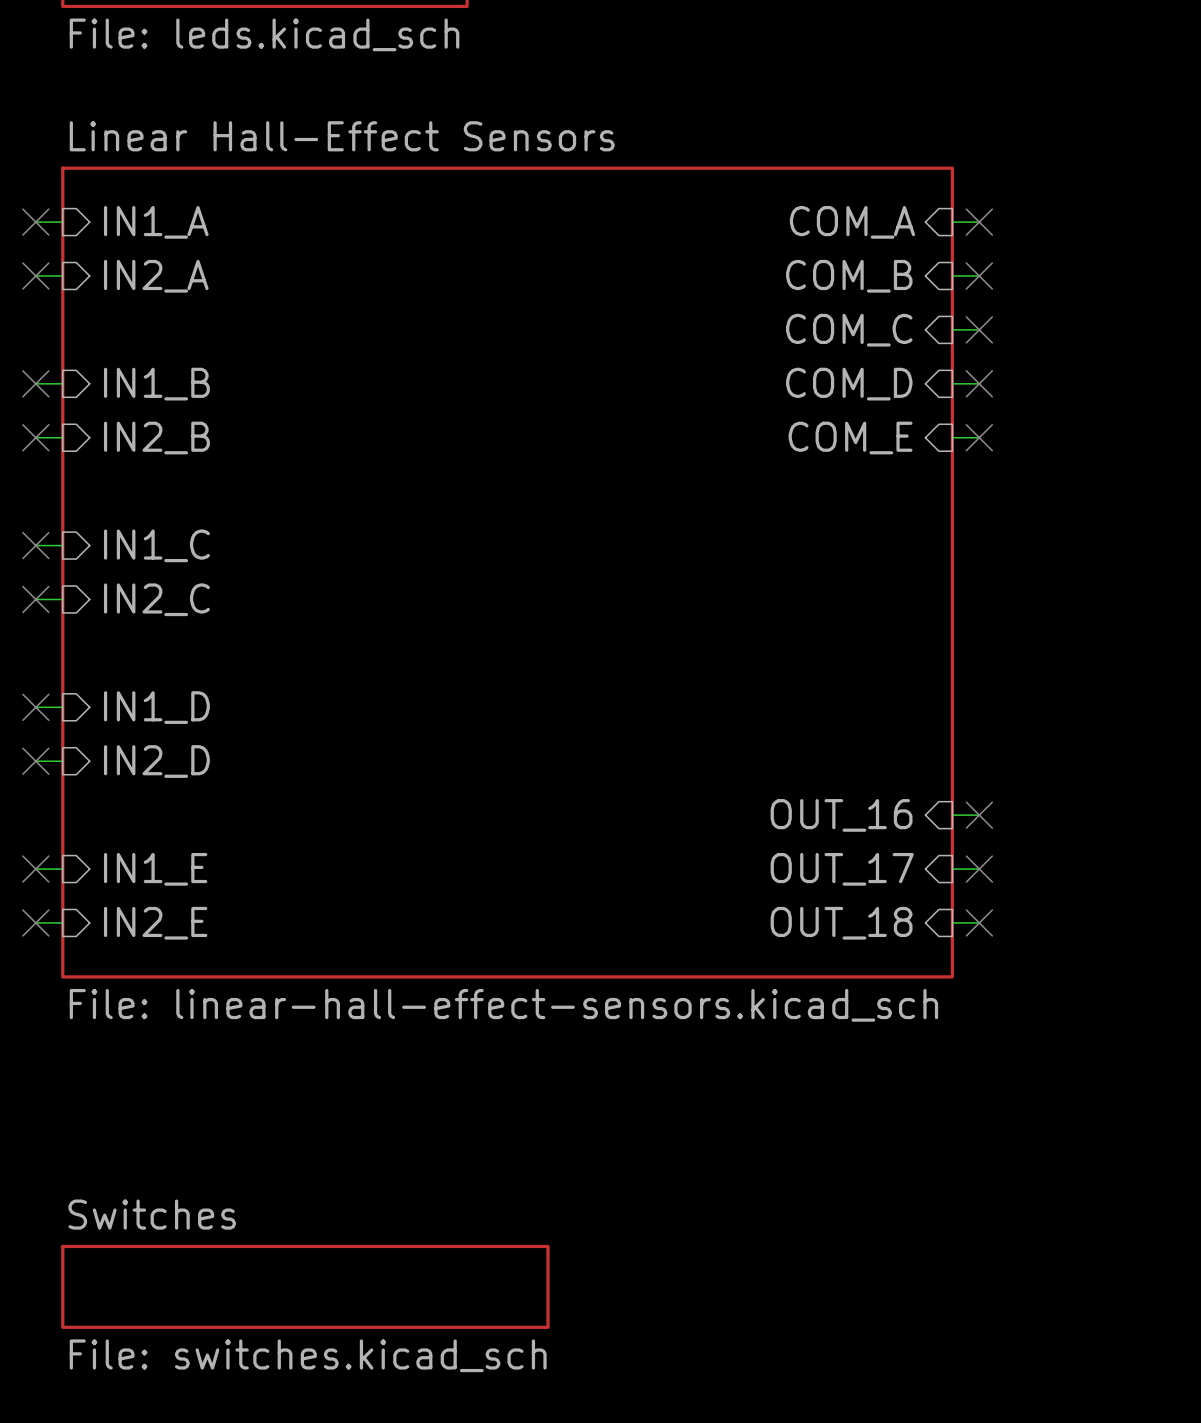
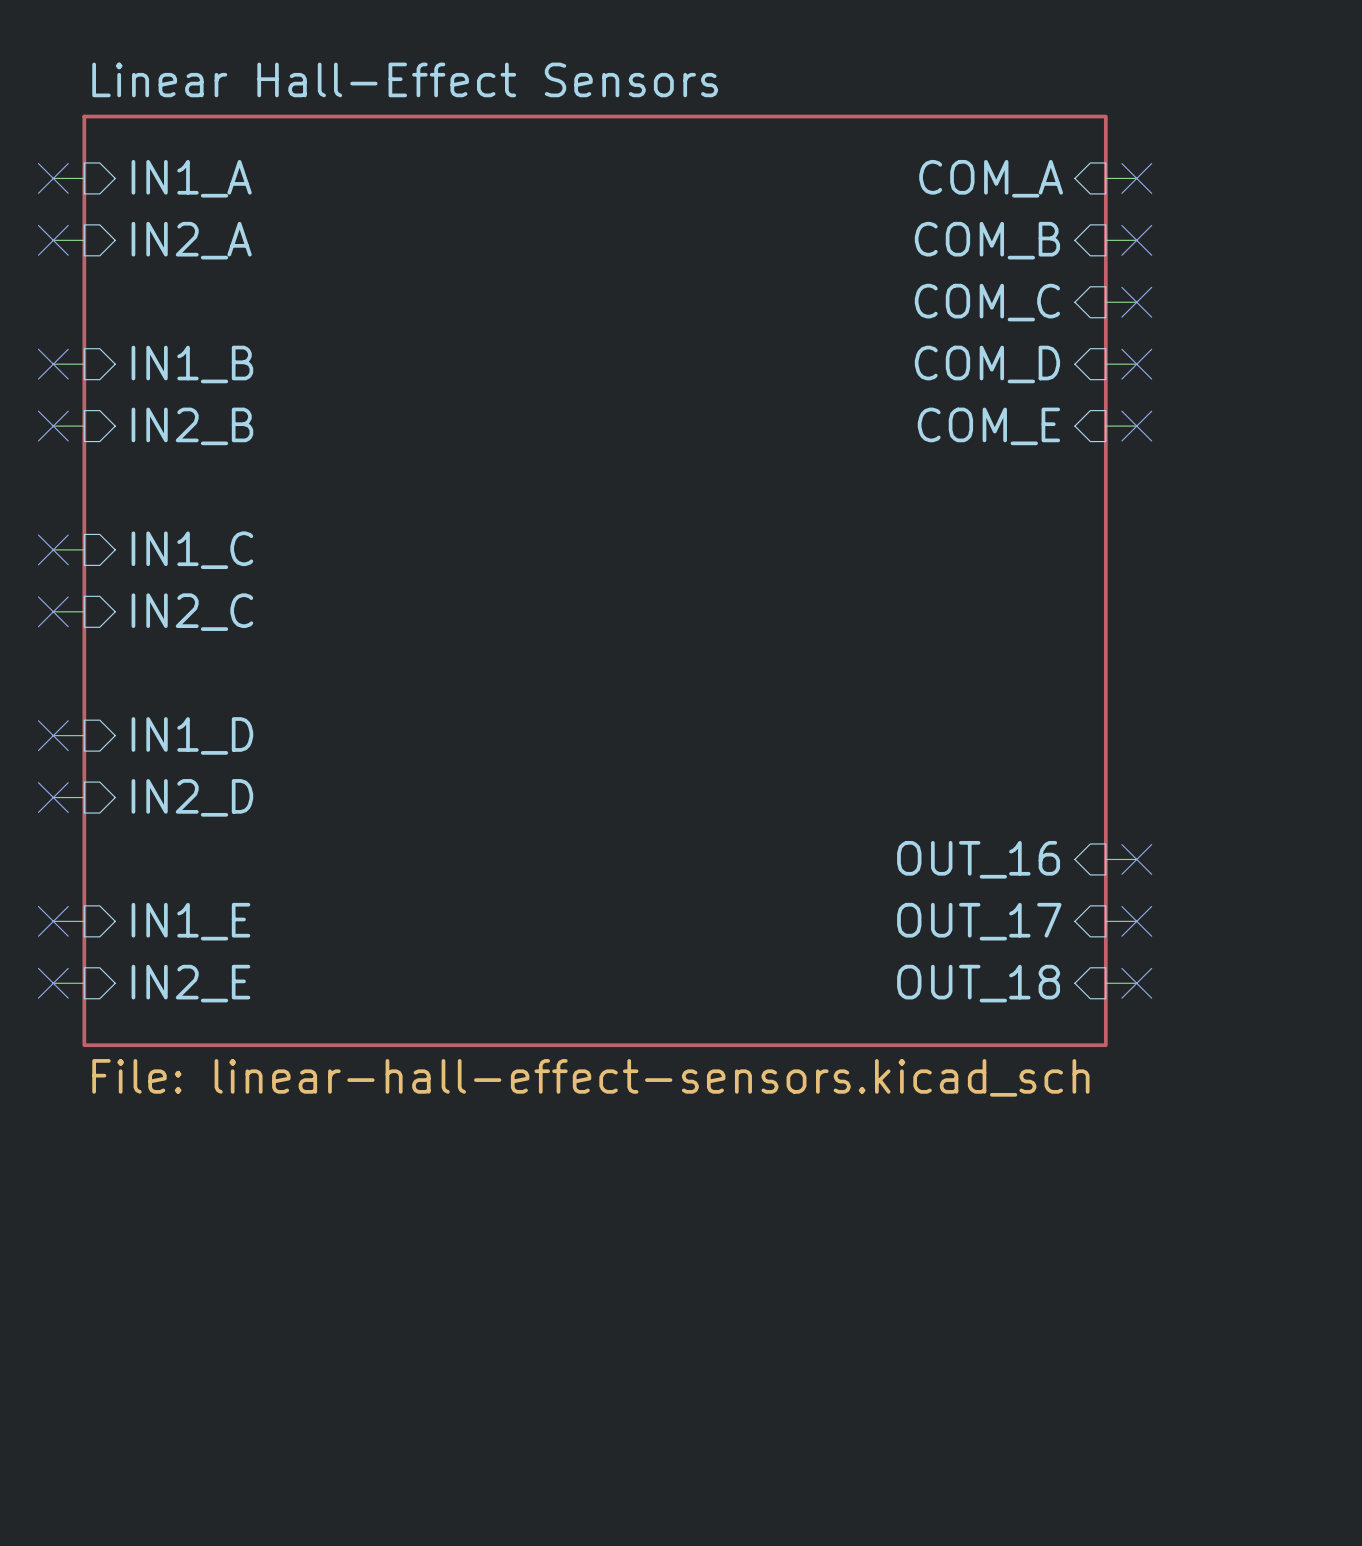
sheet Switches: File: switches.kicad_sch (305, 1286) -> none

